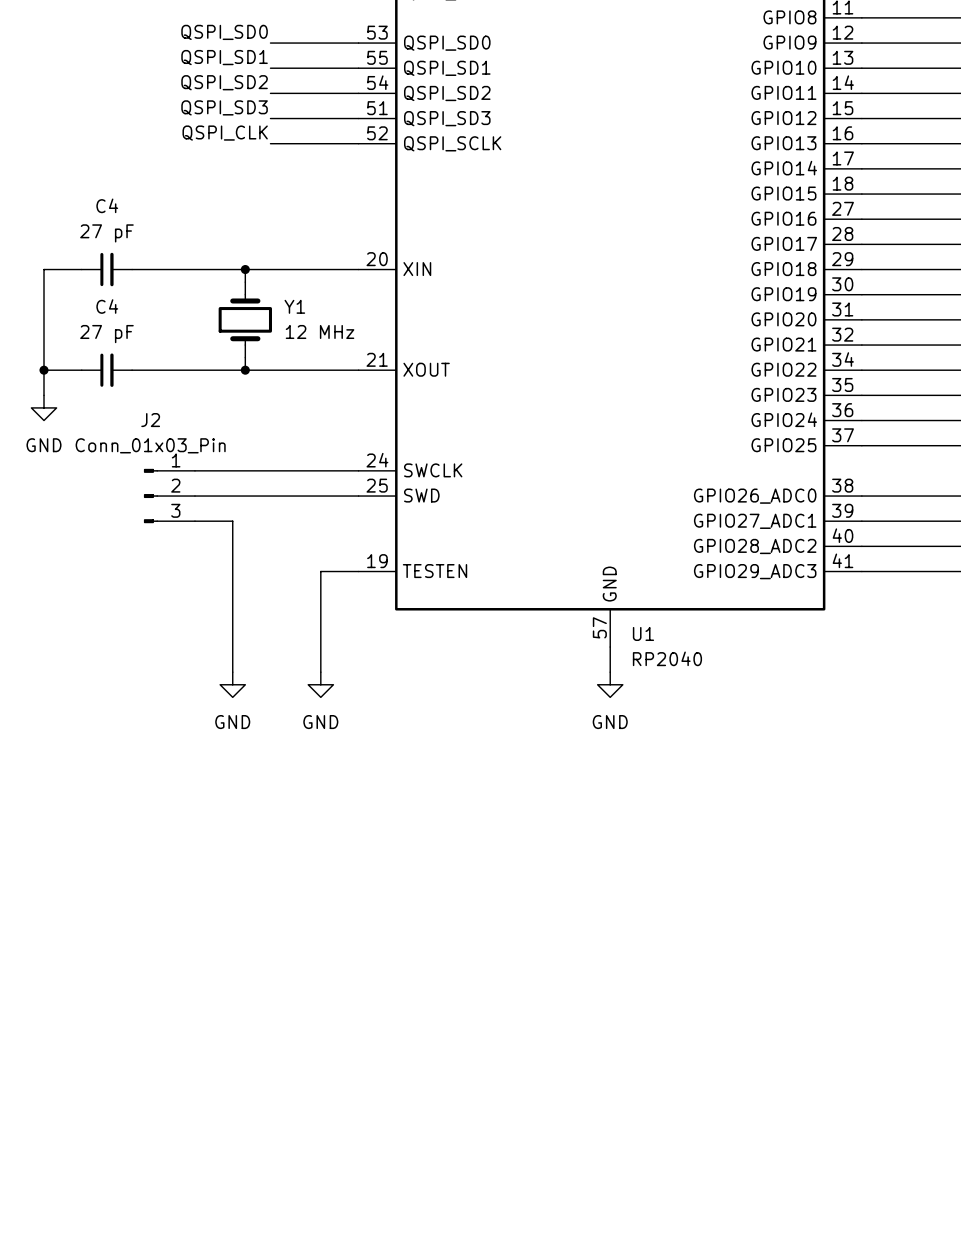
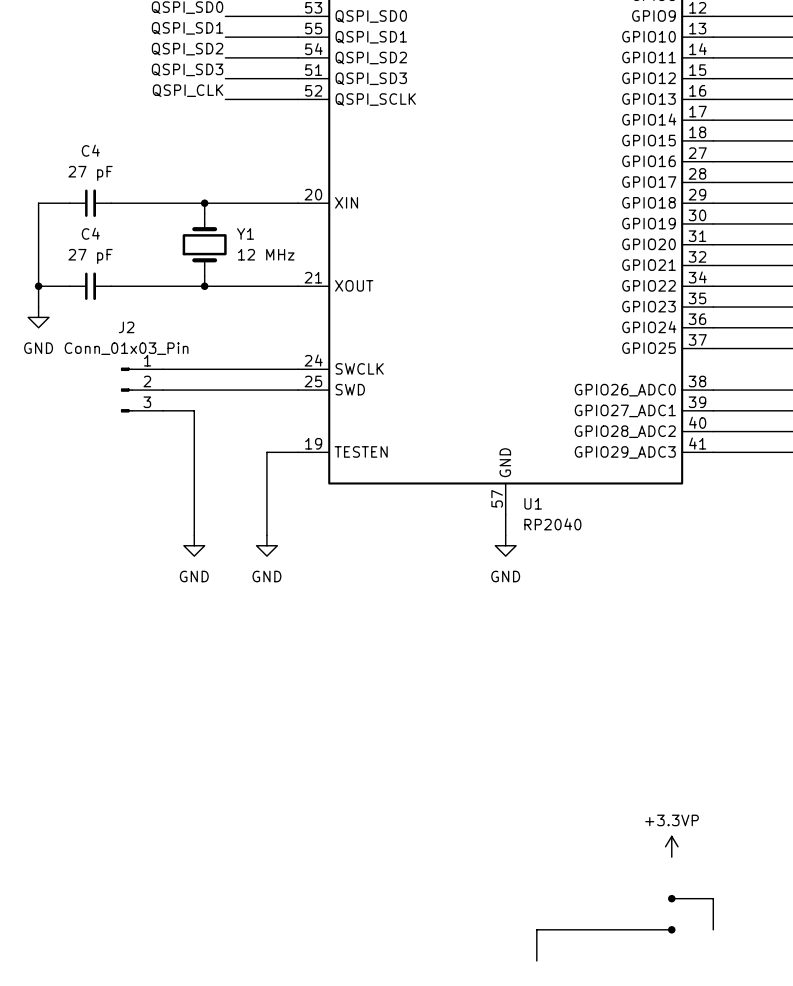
power symbol: none -> +3.3VP (671, 846)
wire: none -> (671, 898) (713, 898) (713, 929)
junction: none -> (671, 898)
wire: none -> (671, 929) (536, 929) (536, 960)
junction: none -> (671, 929)

